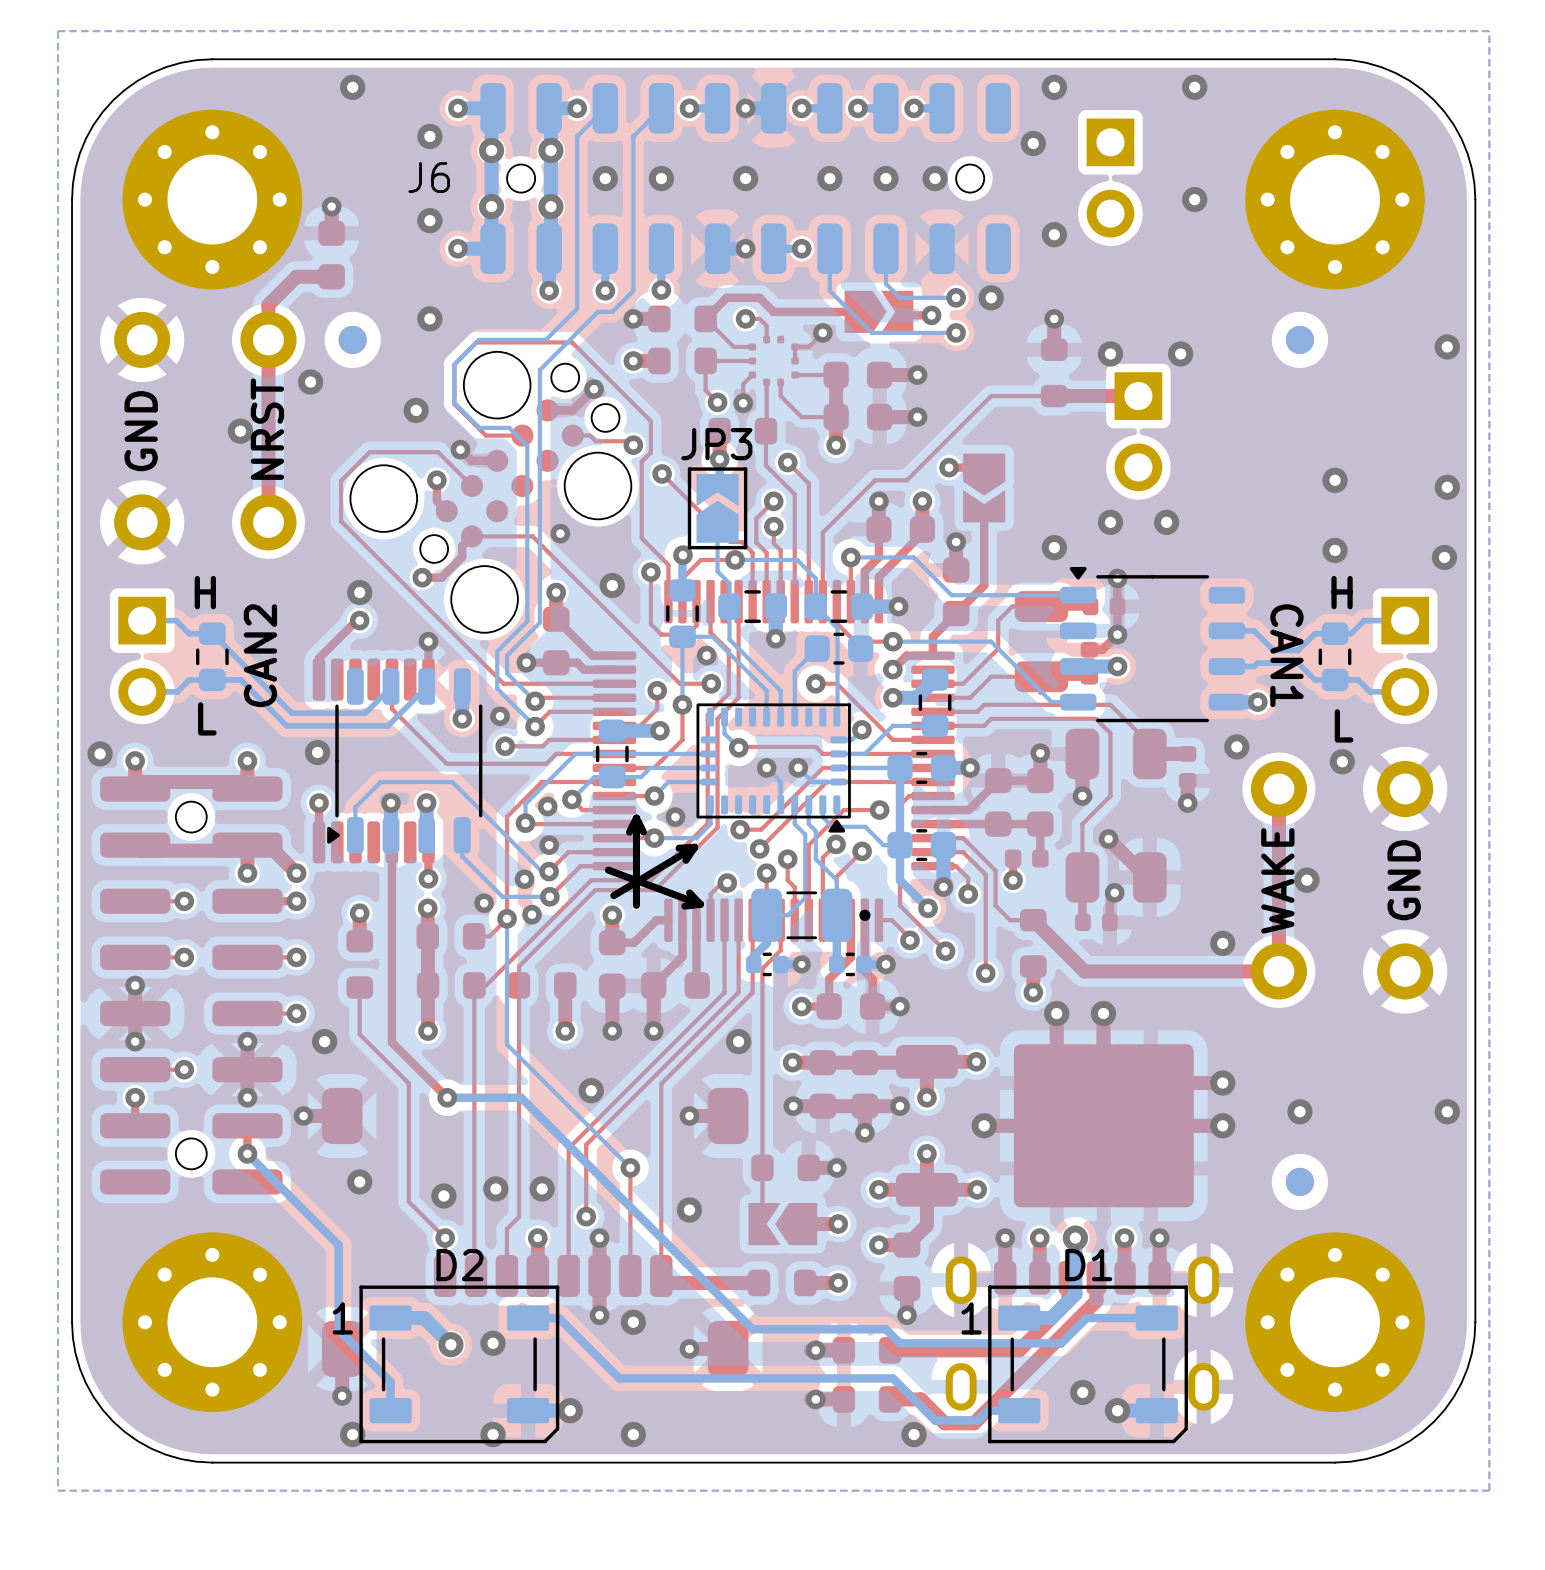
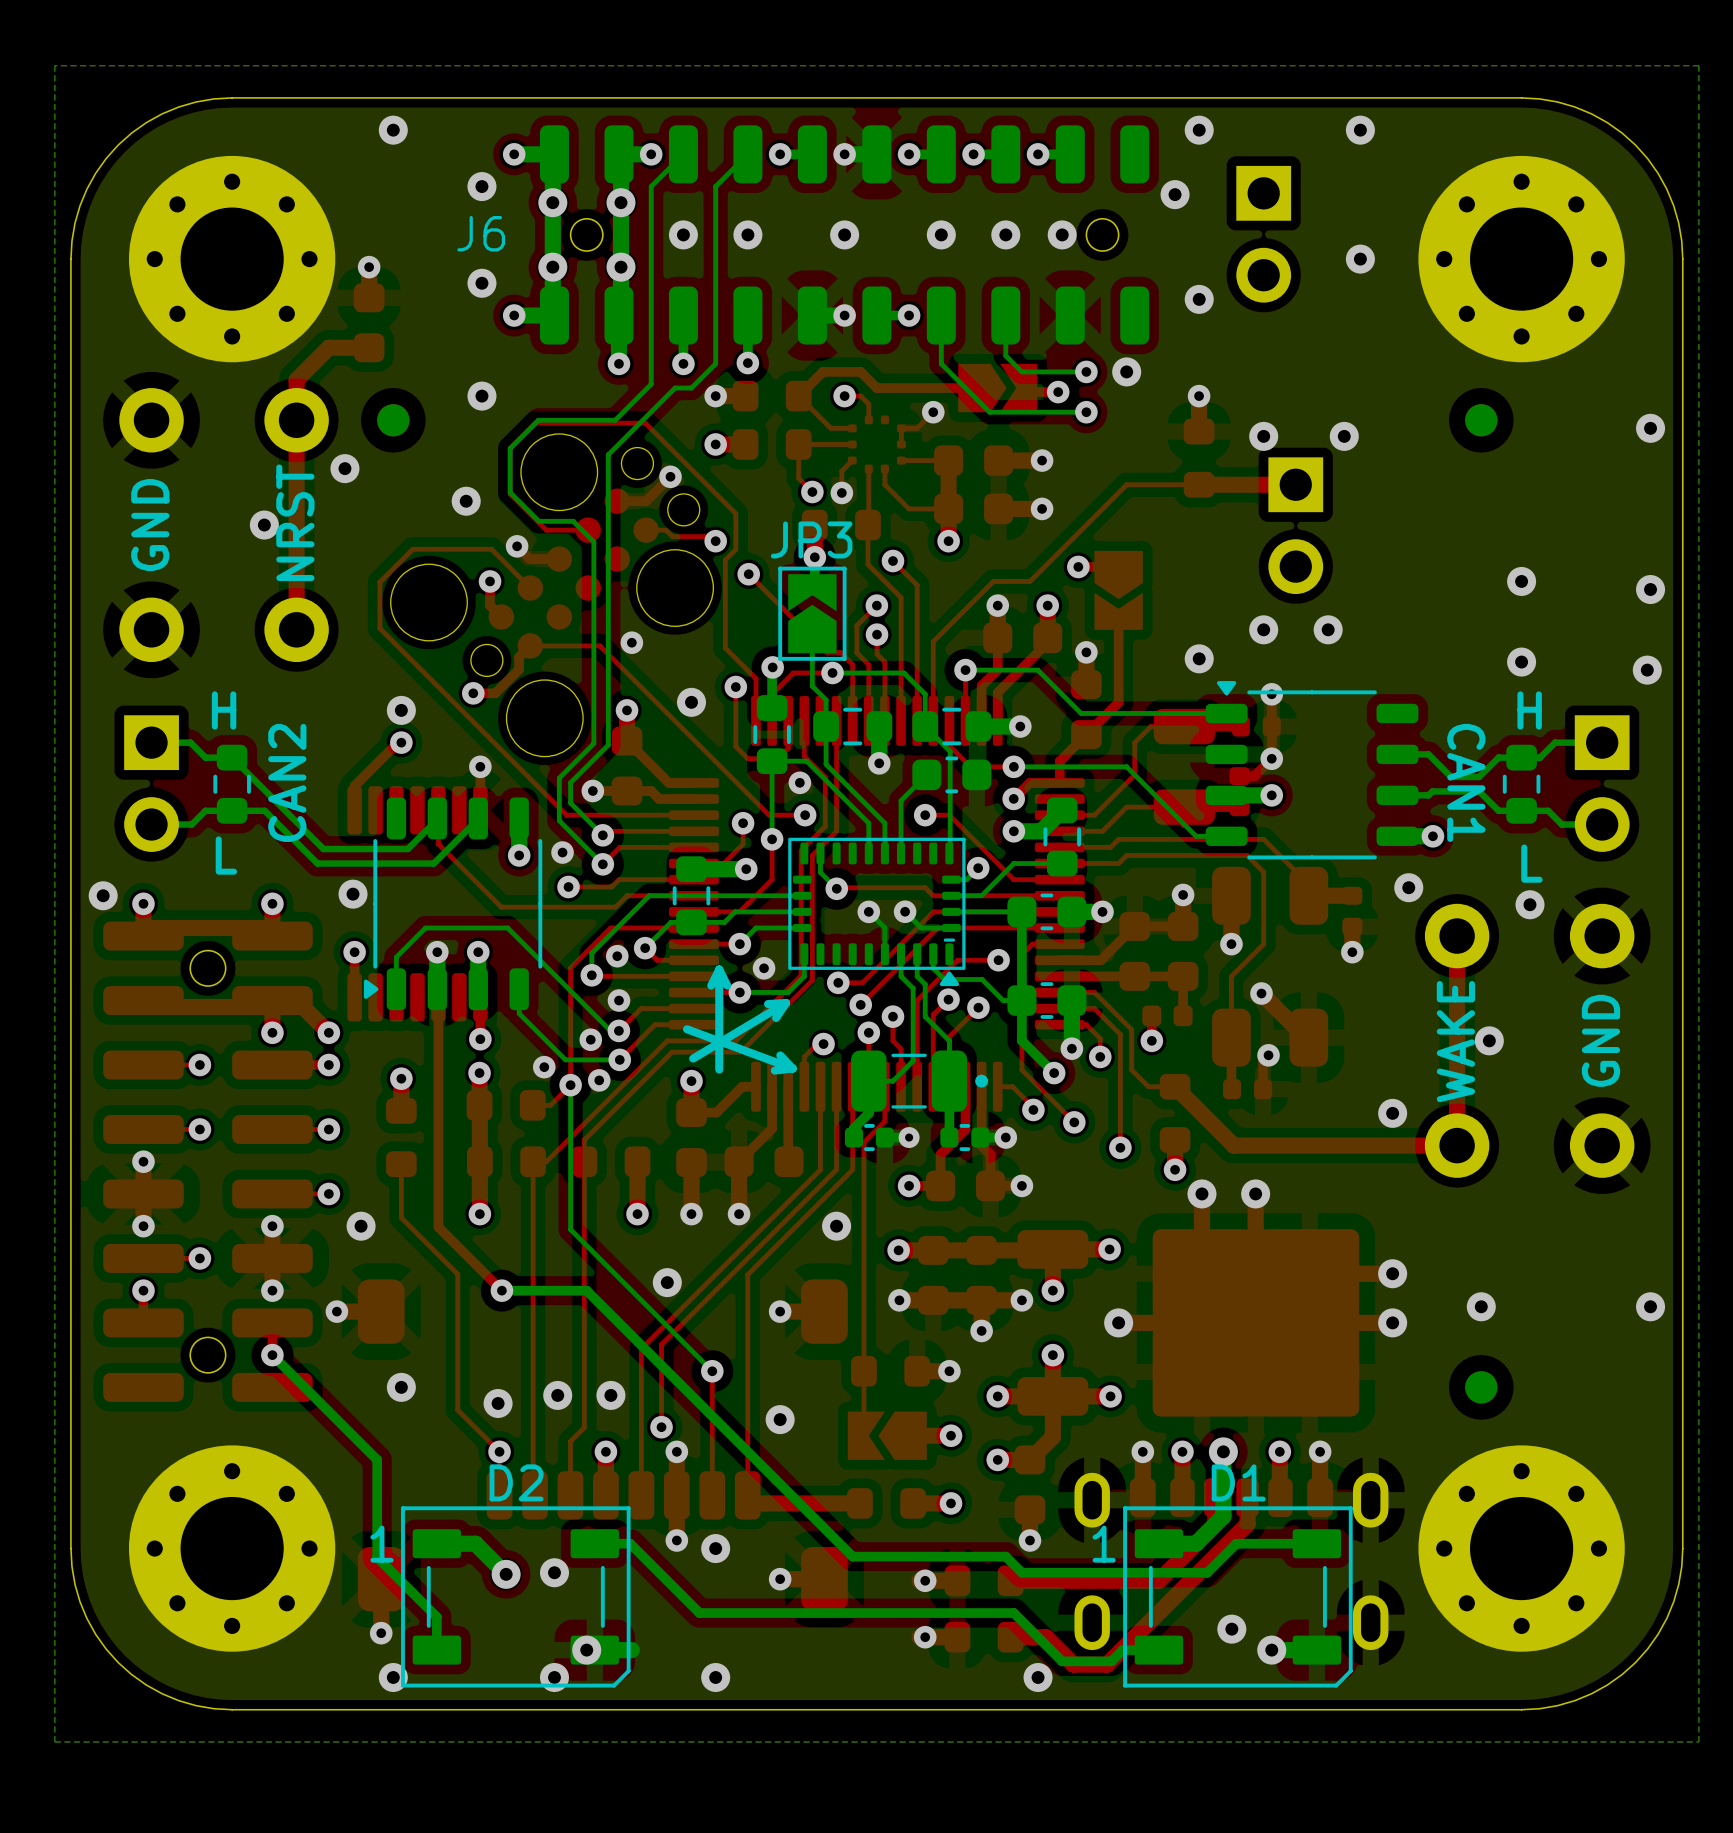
part footprint: [696, 703, 851, 833] -> [788, 837, 966, 987]
via position: (570, 1410) -> (586, 1650)

